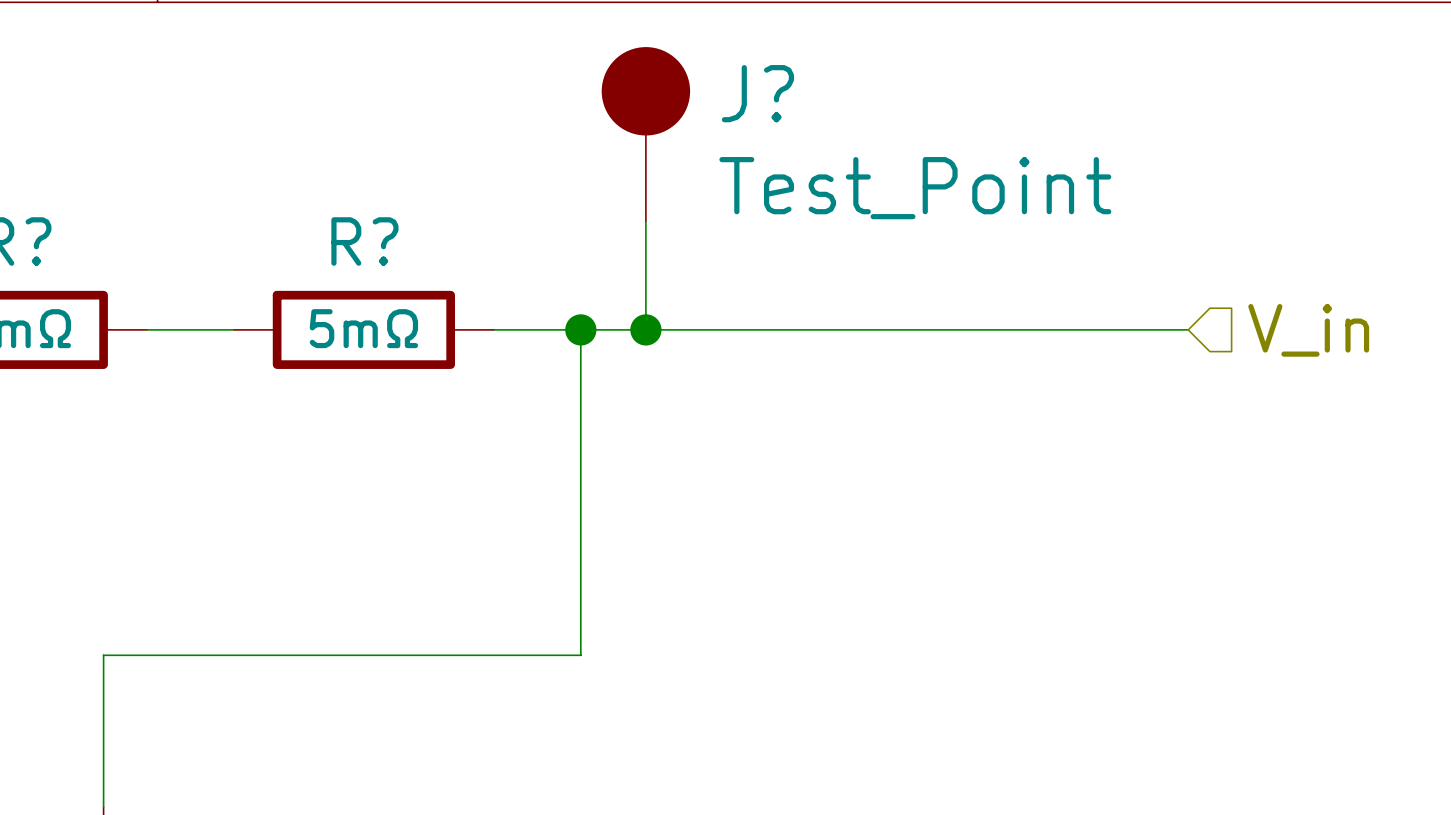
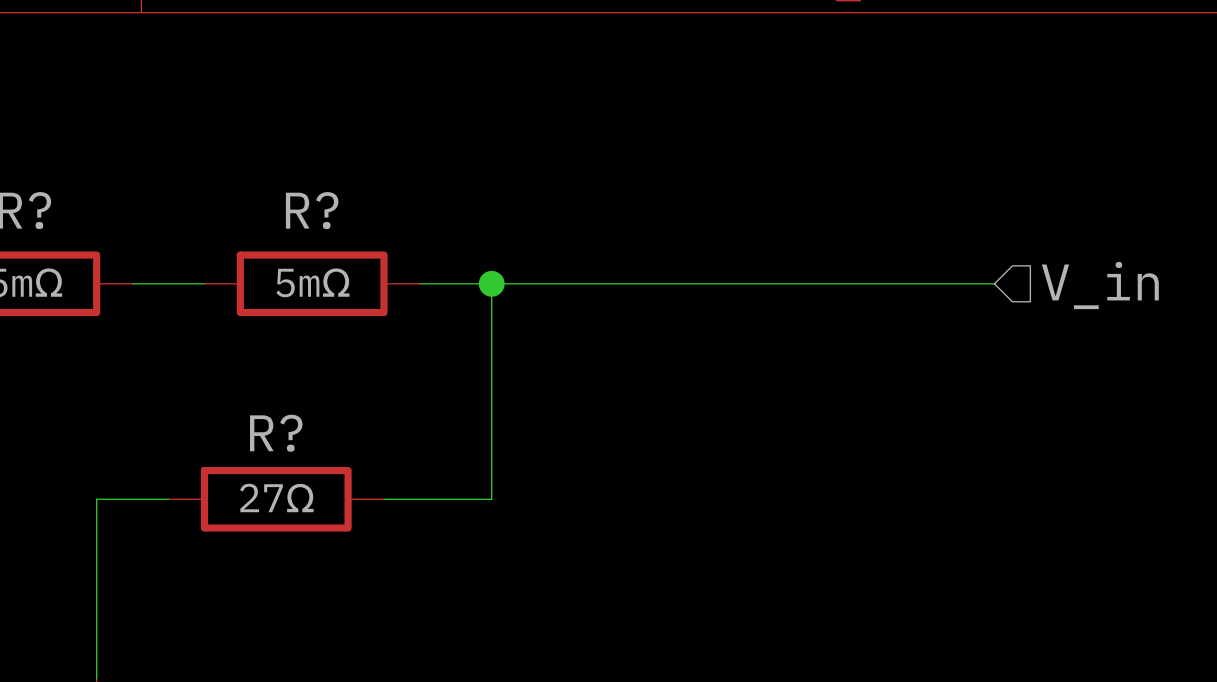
J?: Test_Point (645, 134) -> none
wire: (645, 221) (645, 329) -> none
junction: (645, 329) -> none
wire: none -> (168, 499) (96, 499) (96, 553)
R?: none -> 27Ω (276, 499)
wire: (580, 590) (580, 655) (103, 655) -> (491, 499) (383, 499)

